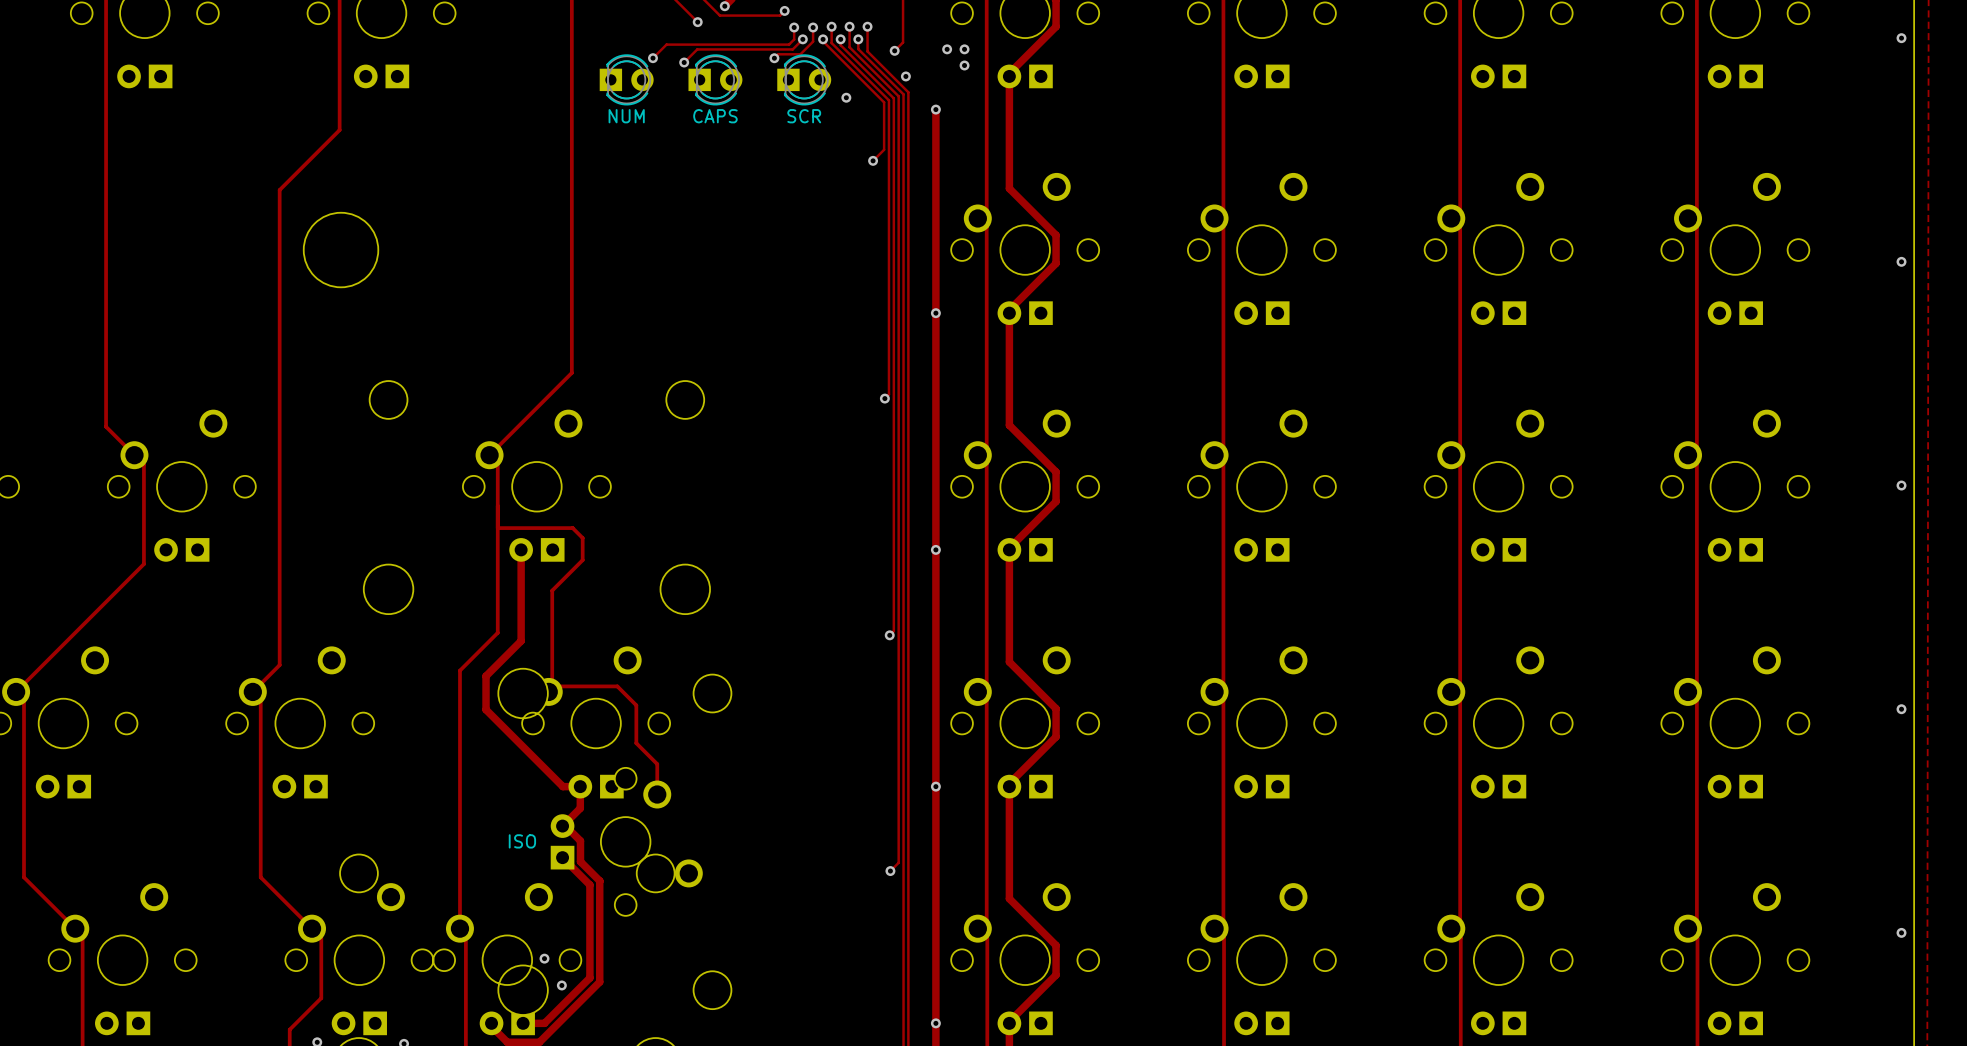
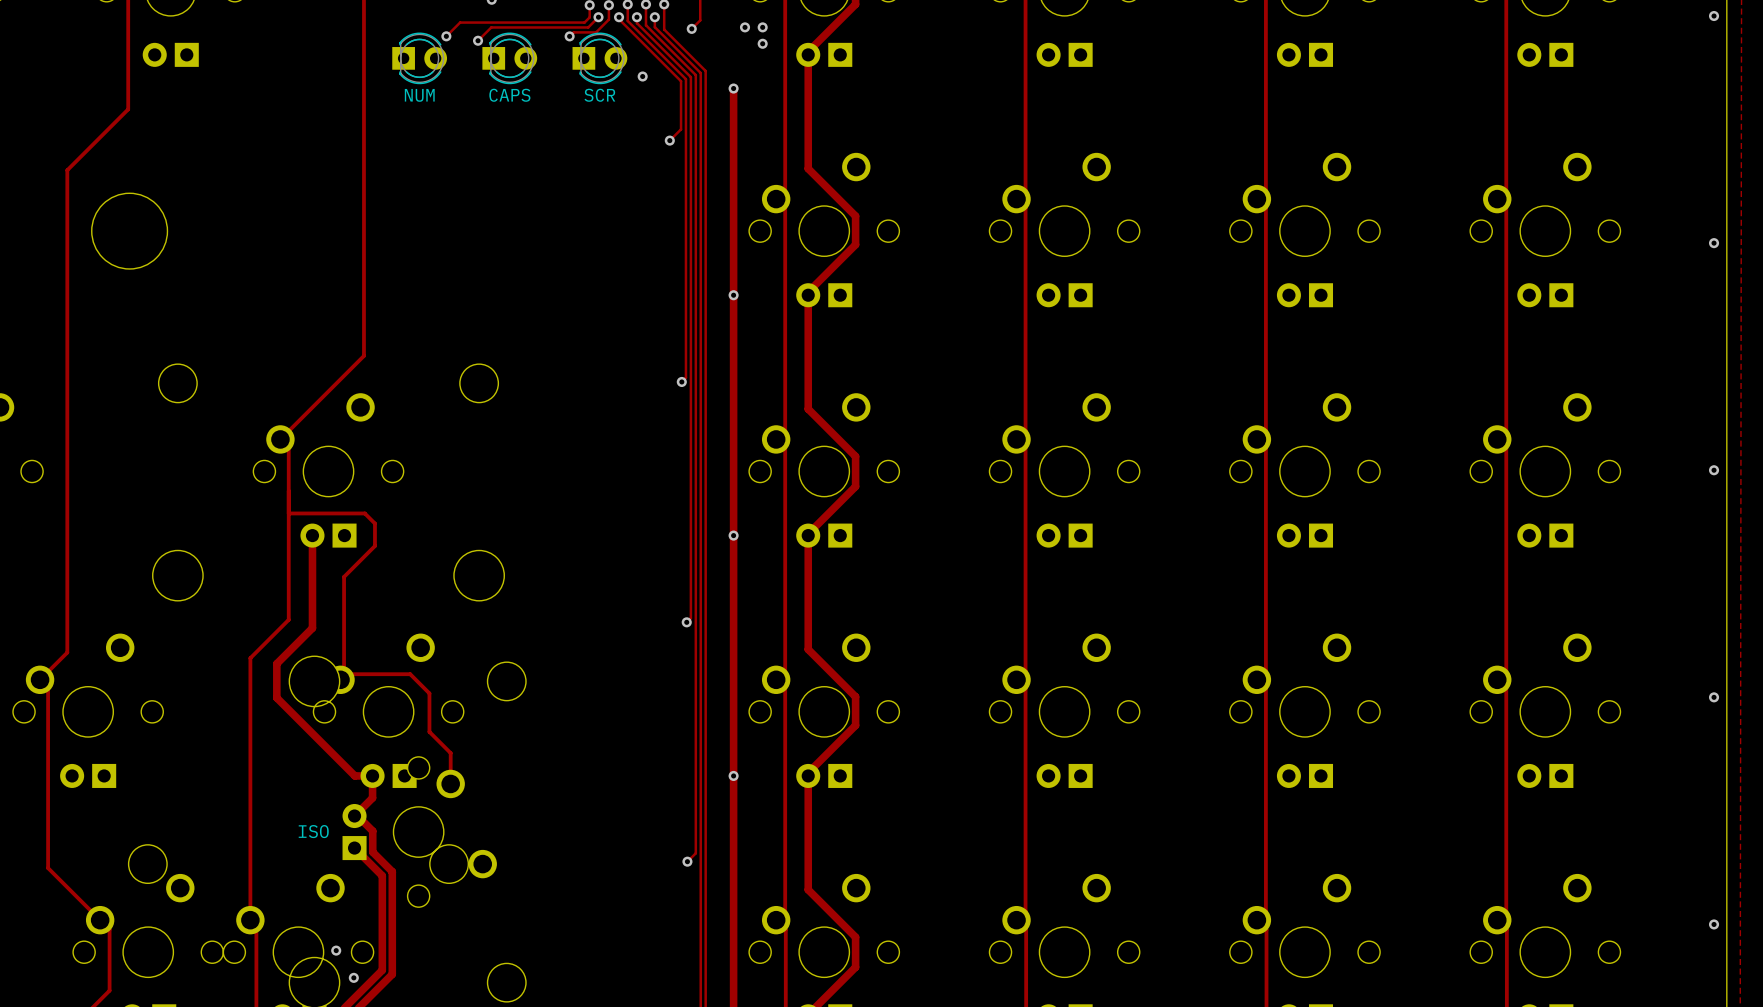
via: (905, 76) -> none

